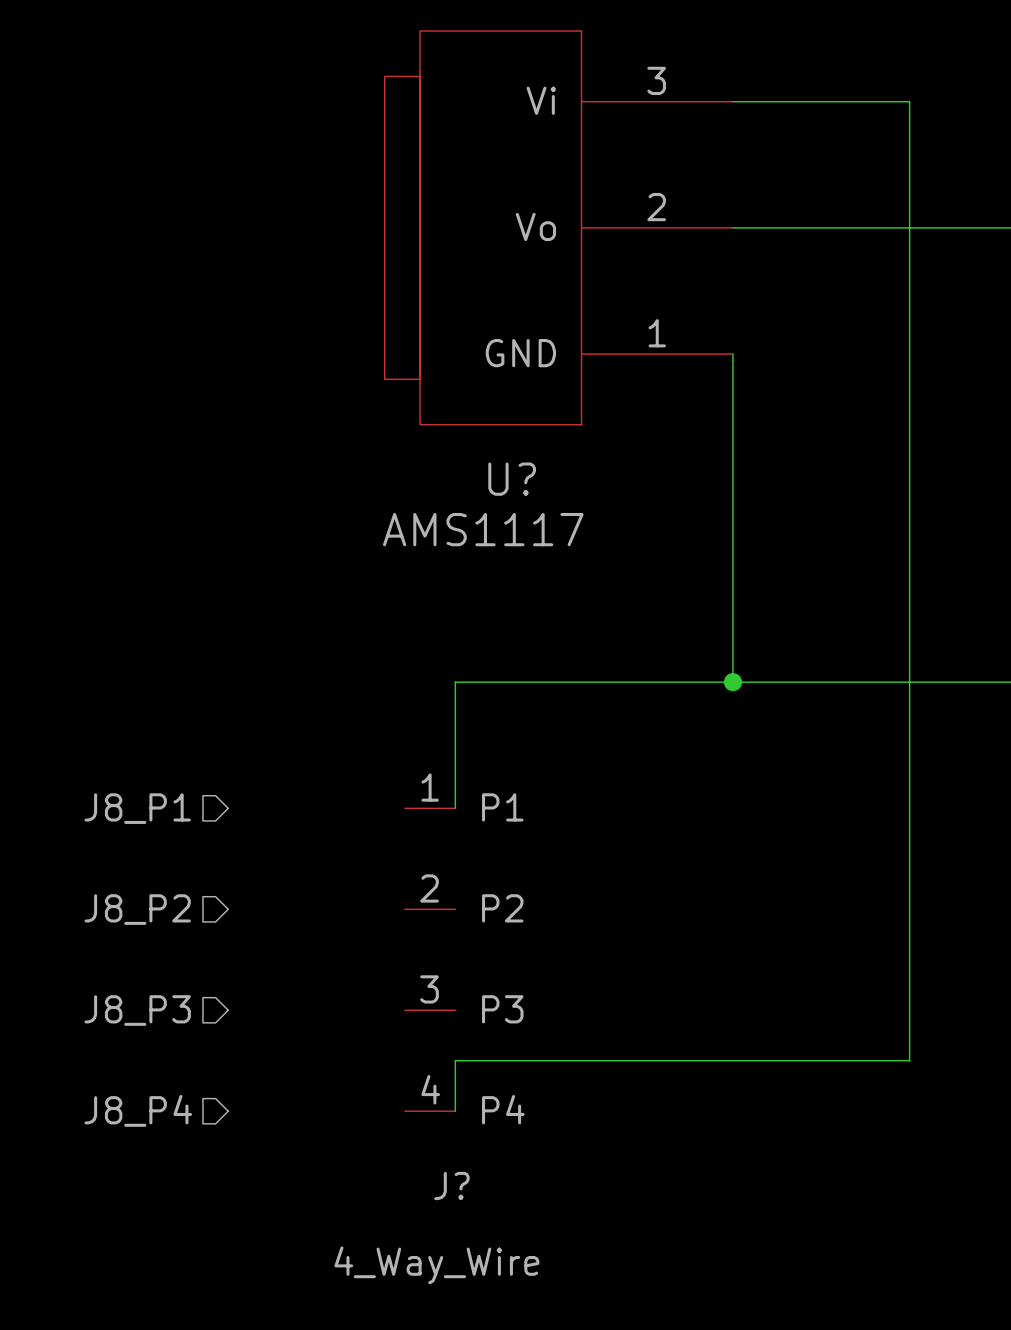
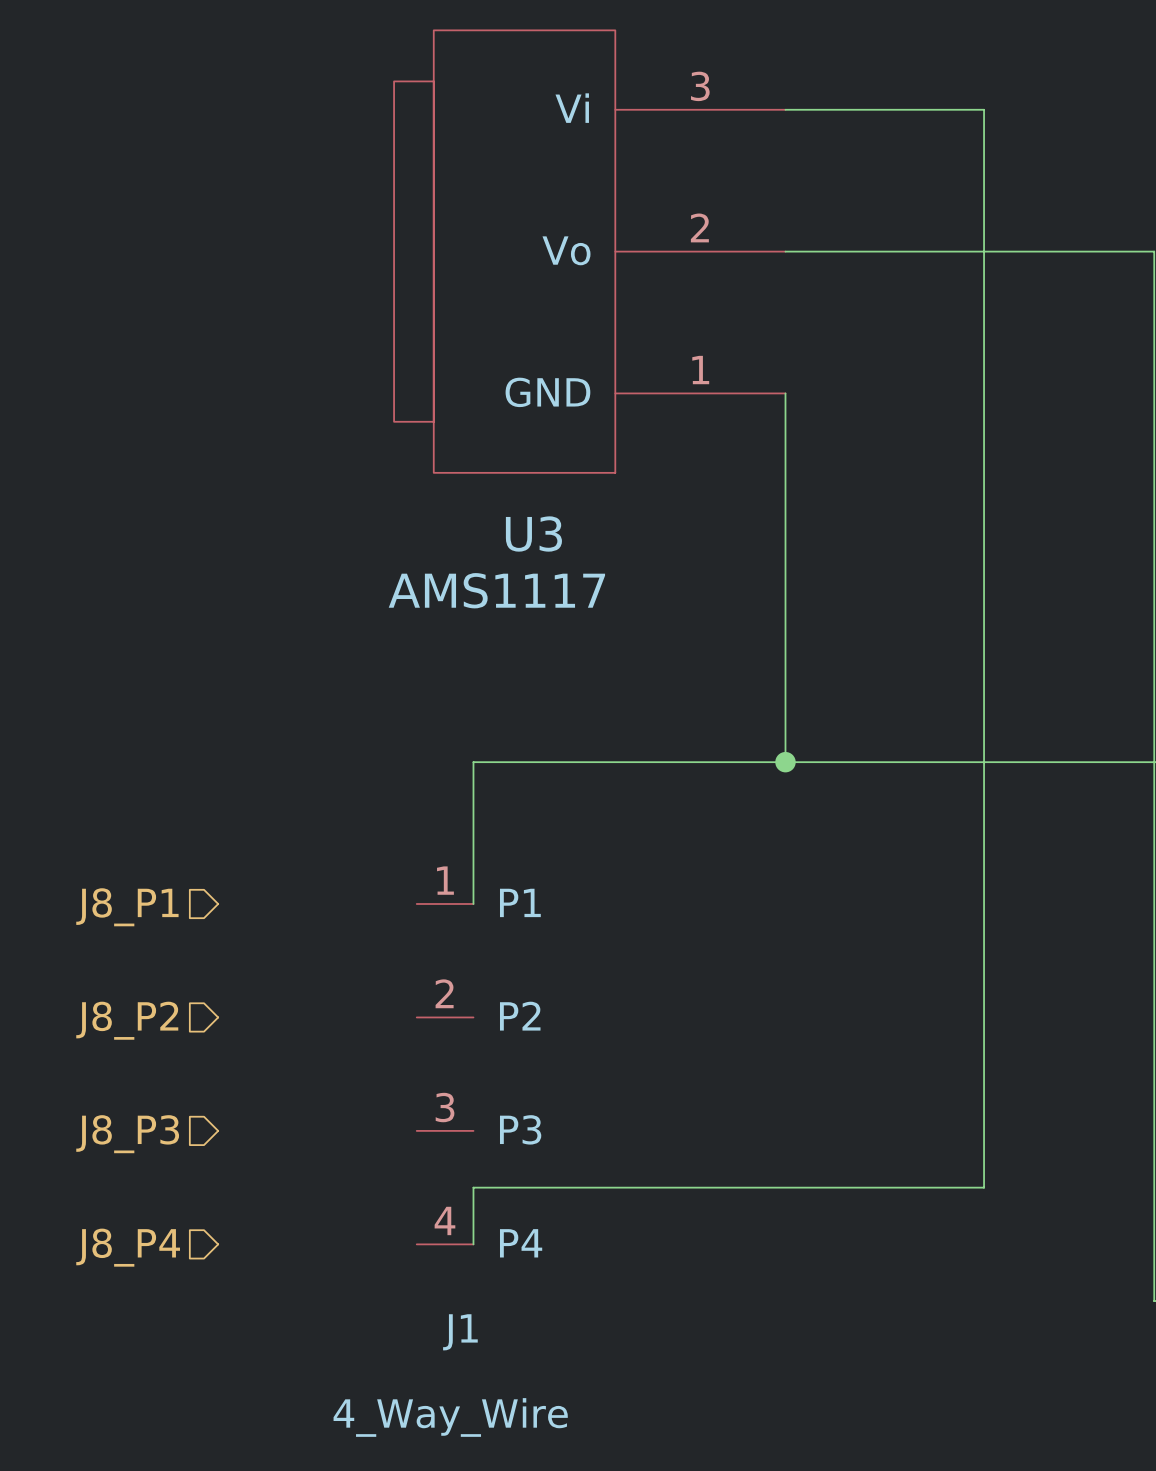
U? name: U? (512, 479) -> U3 (533, 534)
J? name: J? (451, 1185) -> J1 (460, 1332)

